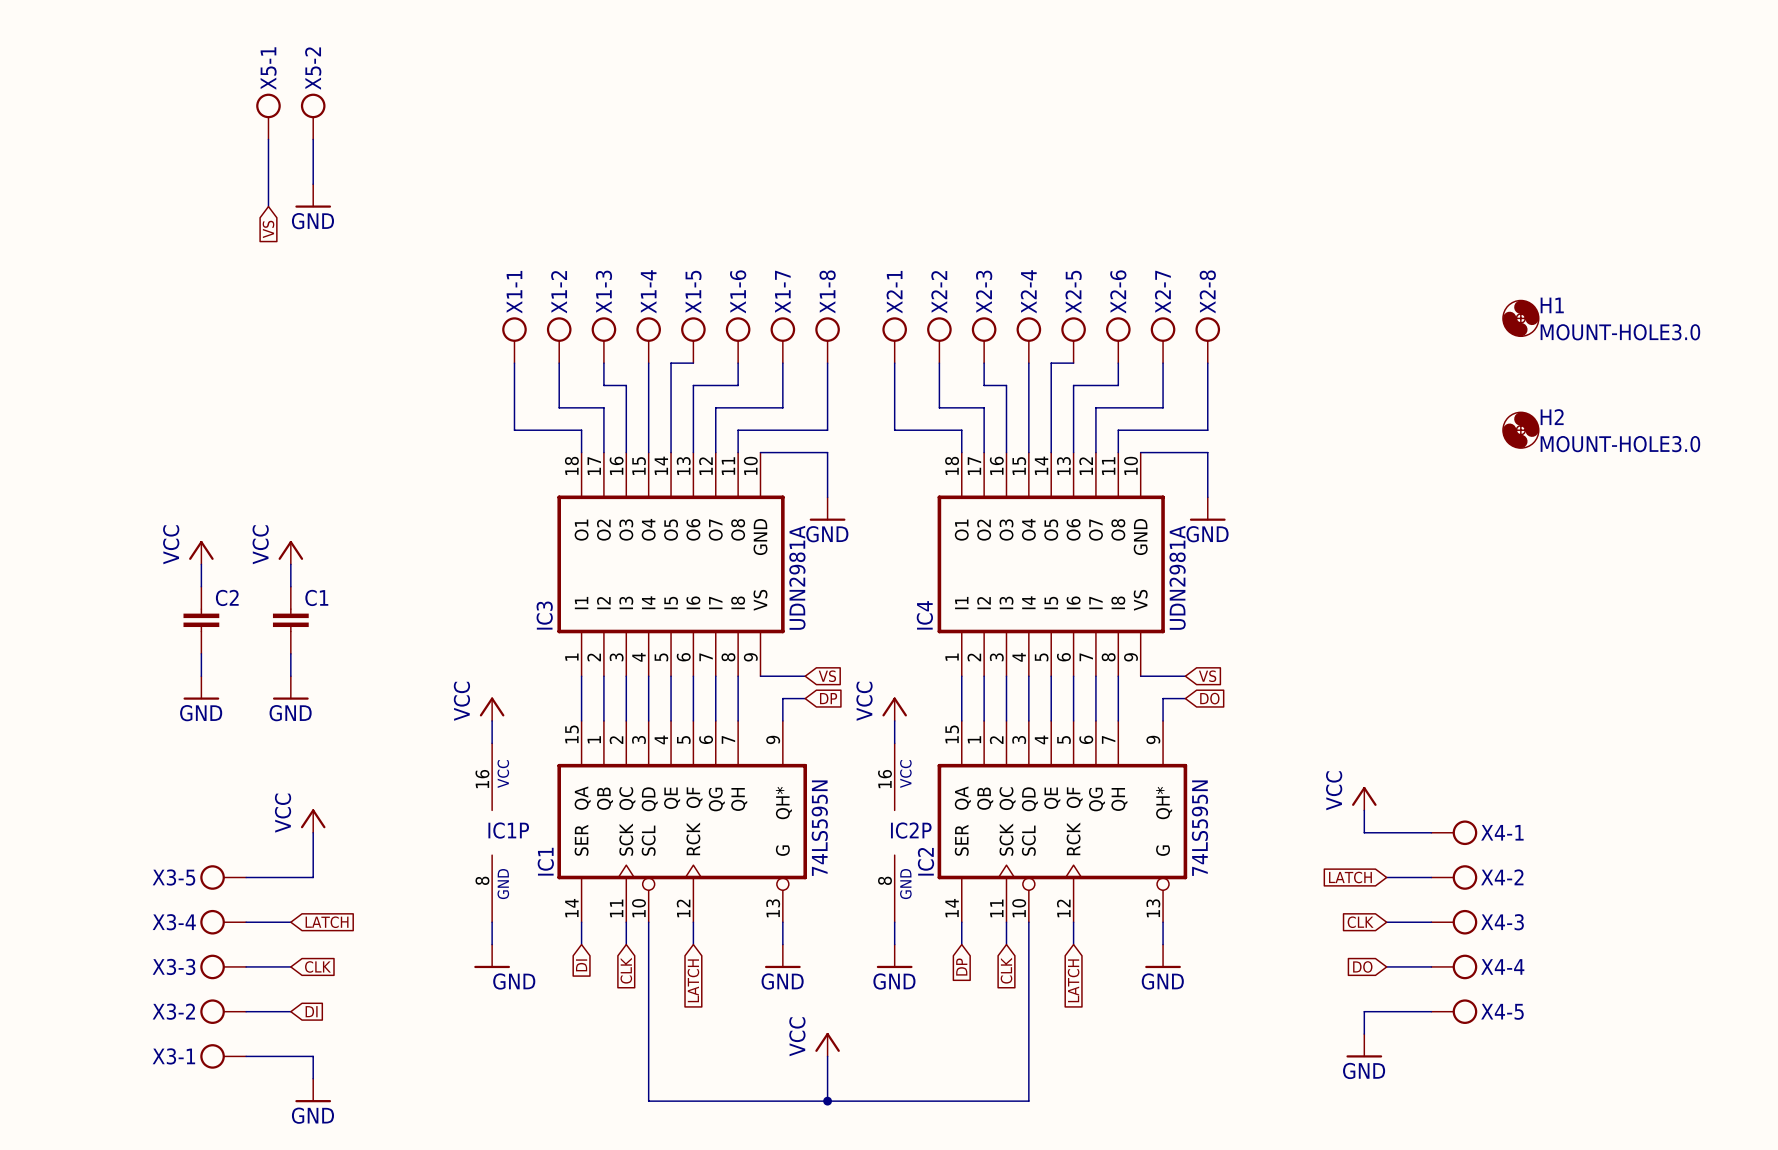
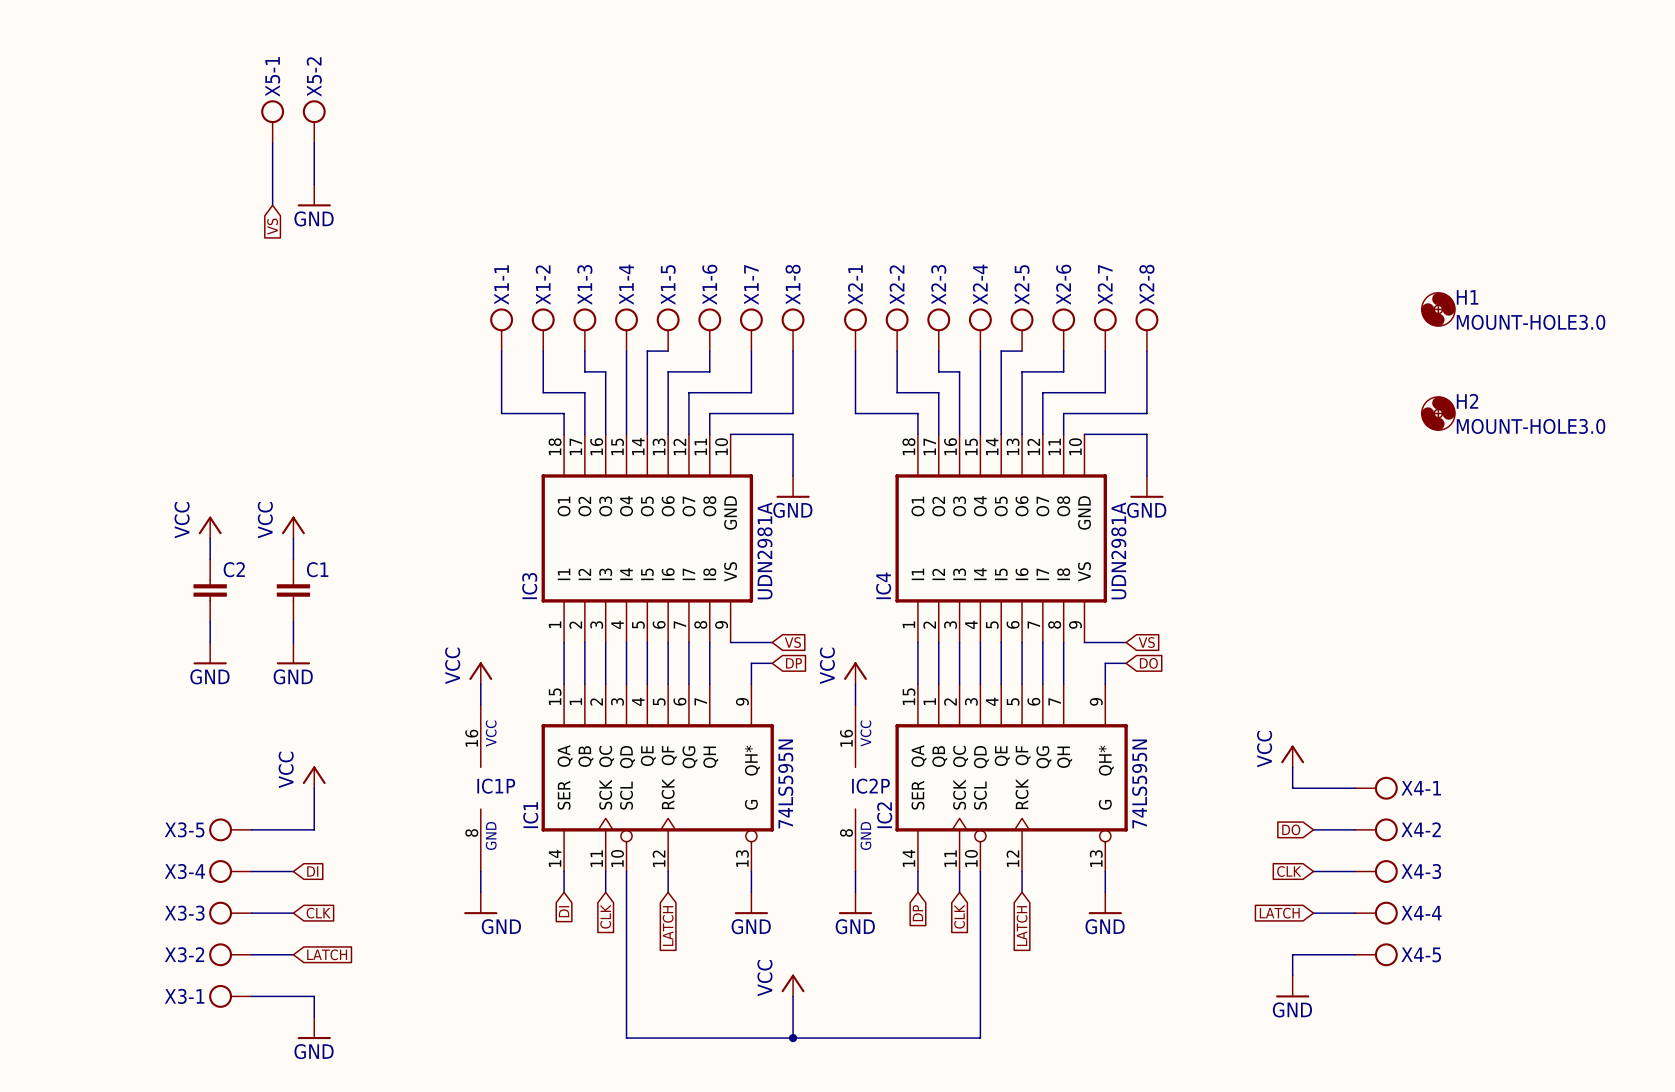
global label: LATCH (1350, 877) -> DO (1291, 829)
global label: LATCH (327, 922) -> DI (312, 871)
global label: DO (1362, 966) -> LATCH (1279, 913)
global label: DI (311, 1011) -> LATCH (327, 954)

